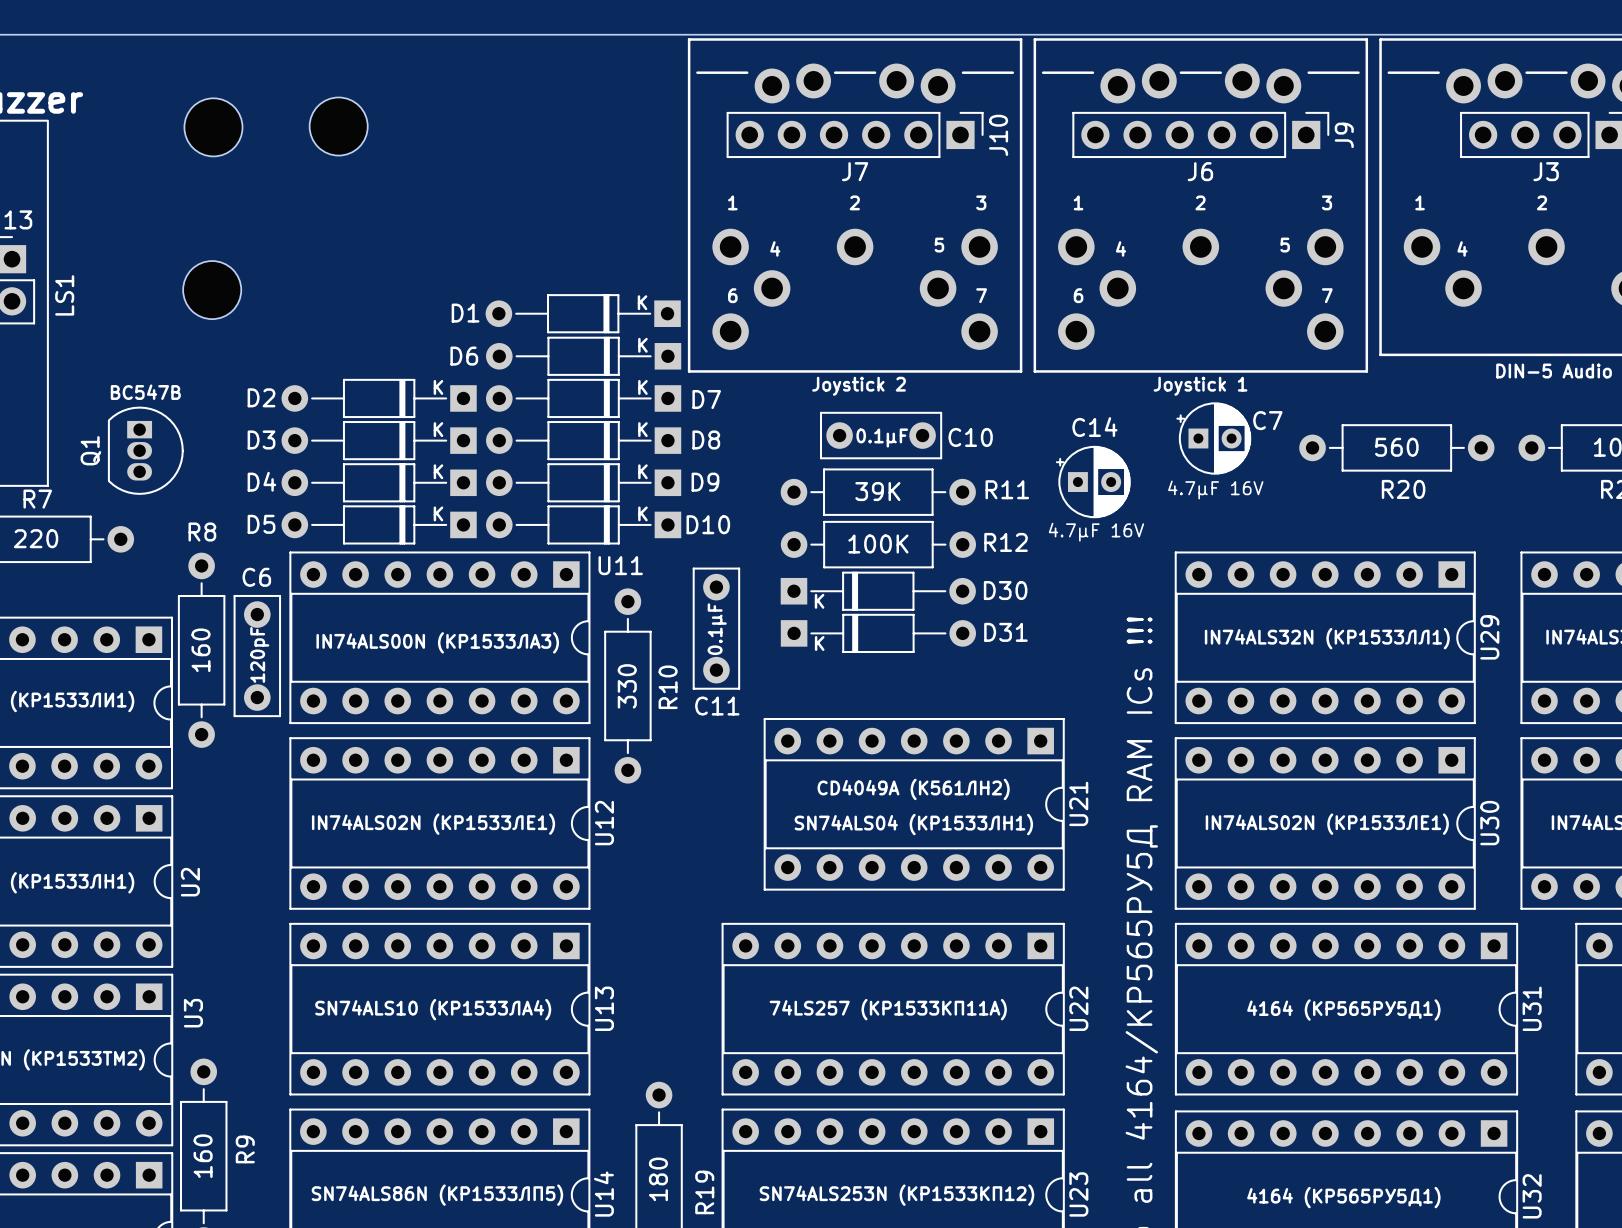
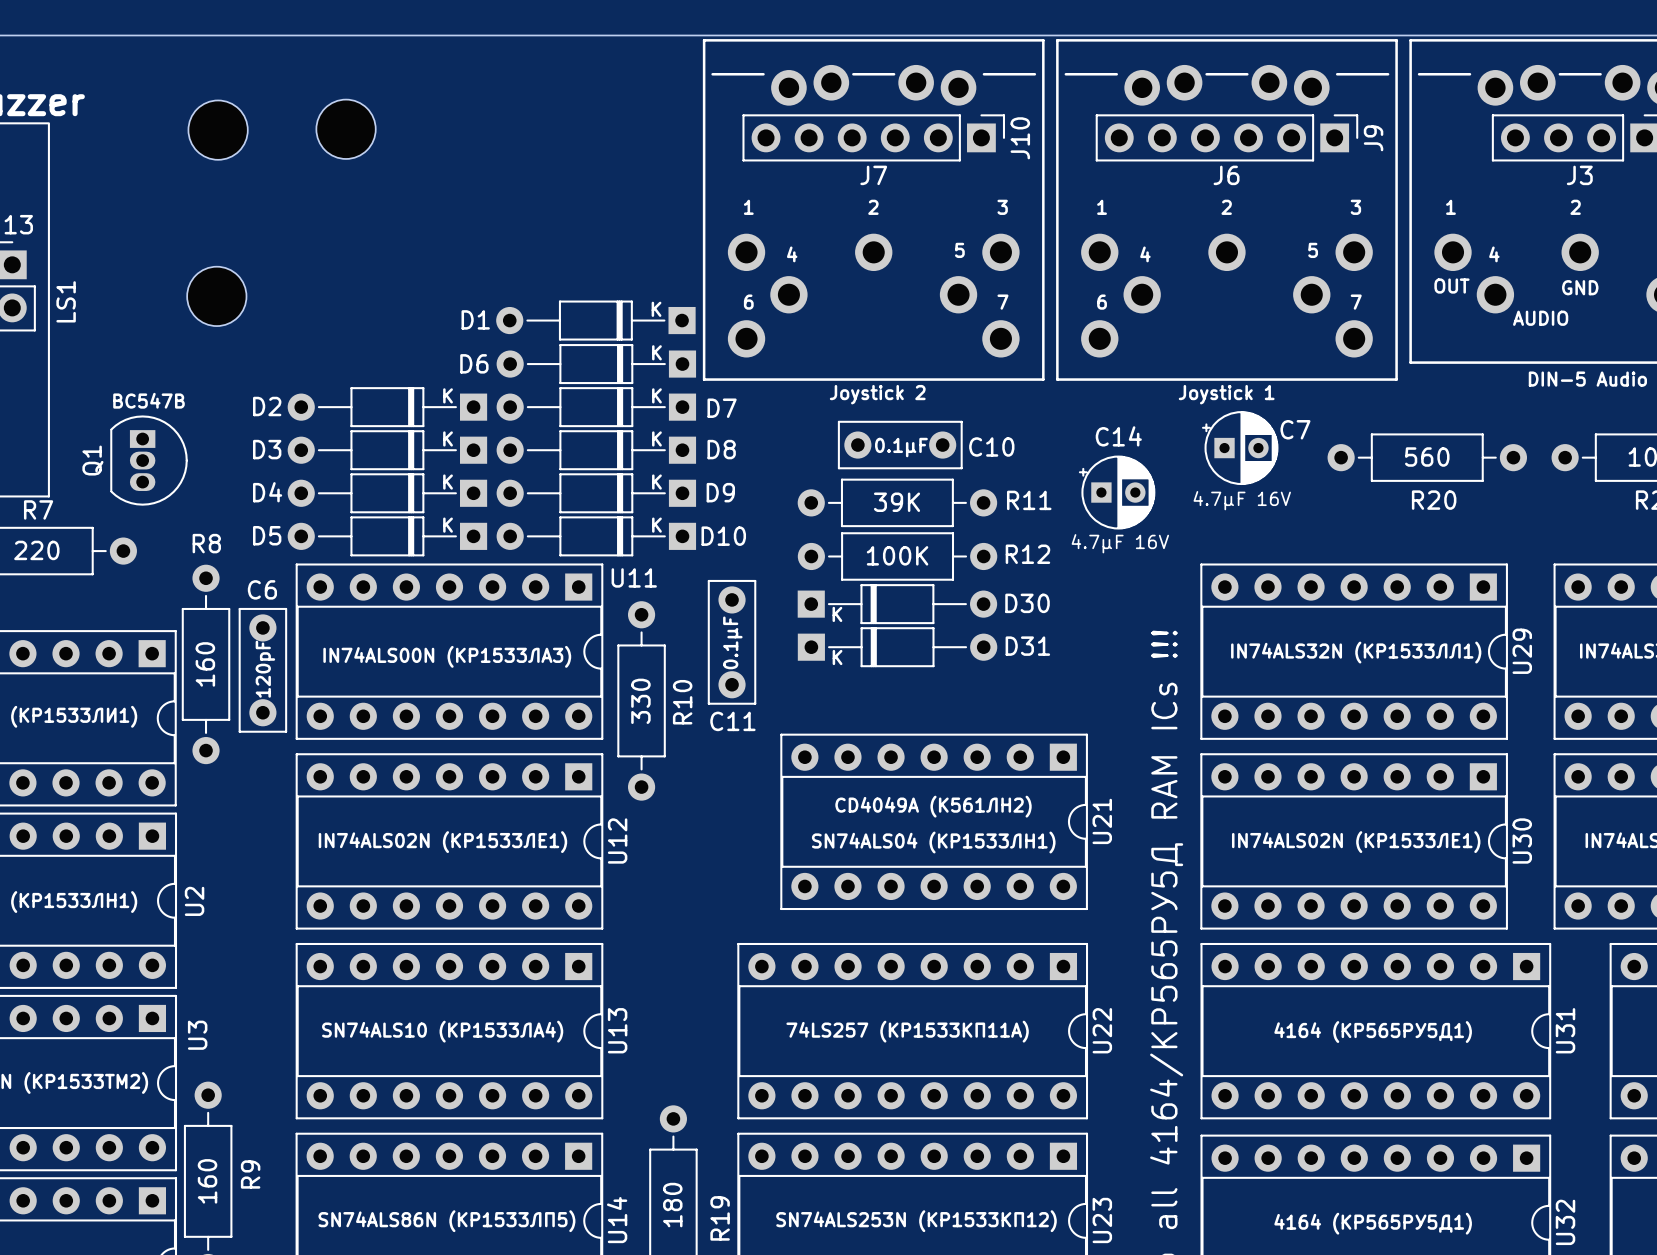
text: none -> OUT (1451, 286)
text: none -> GND (1580, 287)
text: none -> AUDIO (1540, 318)

